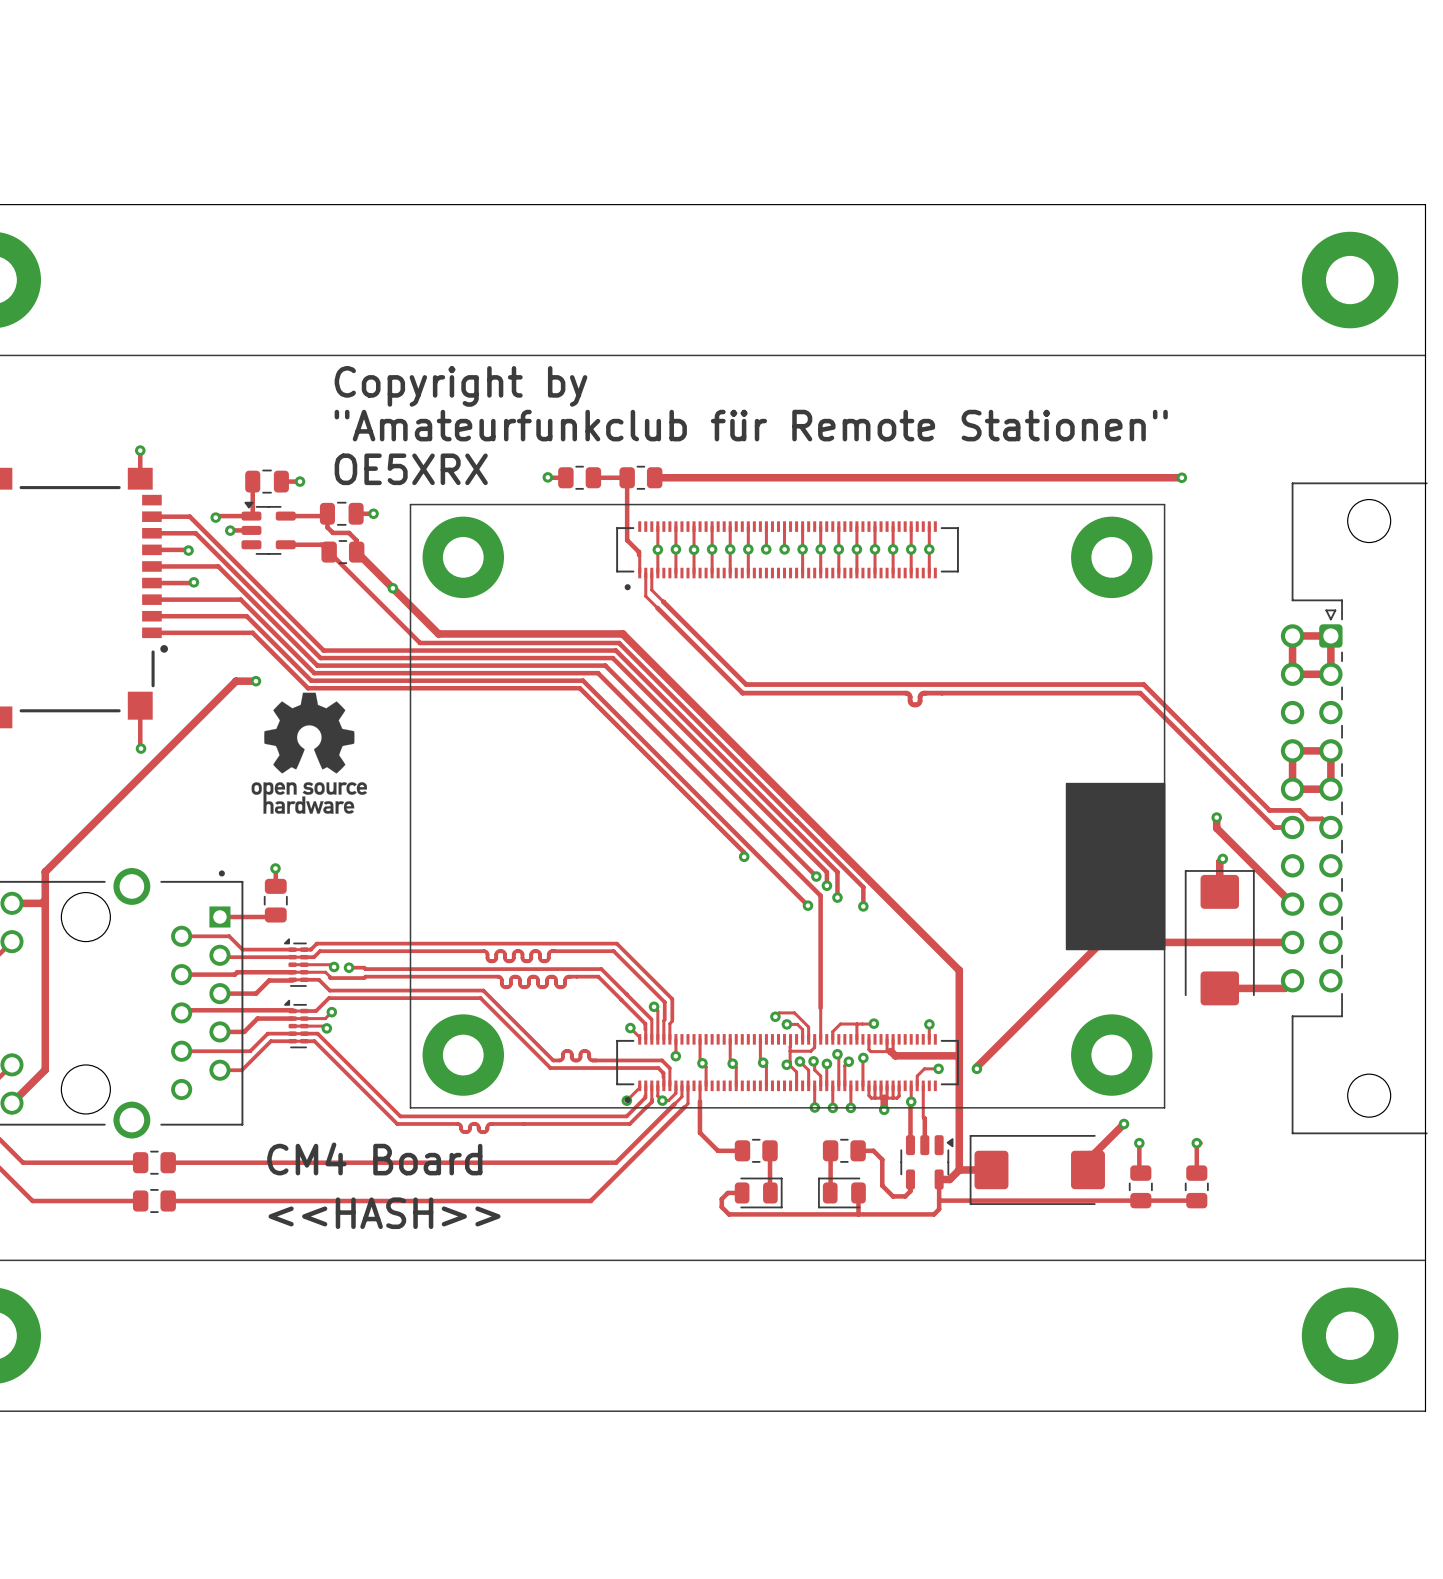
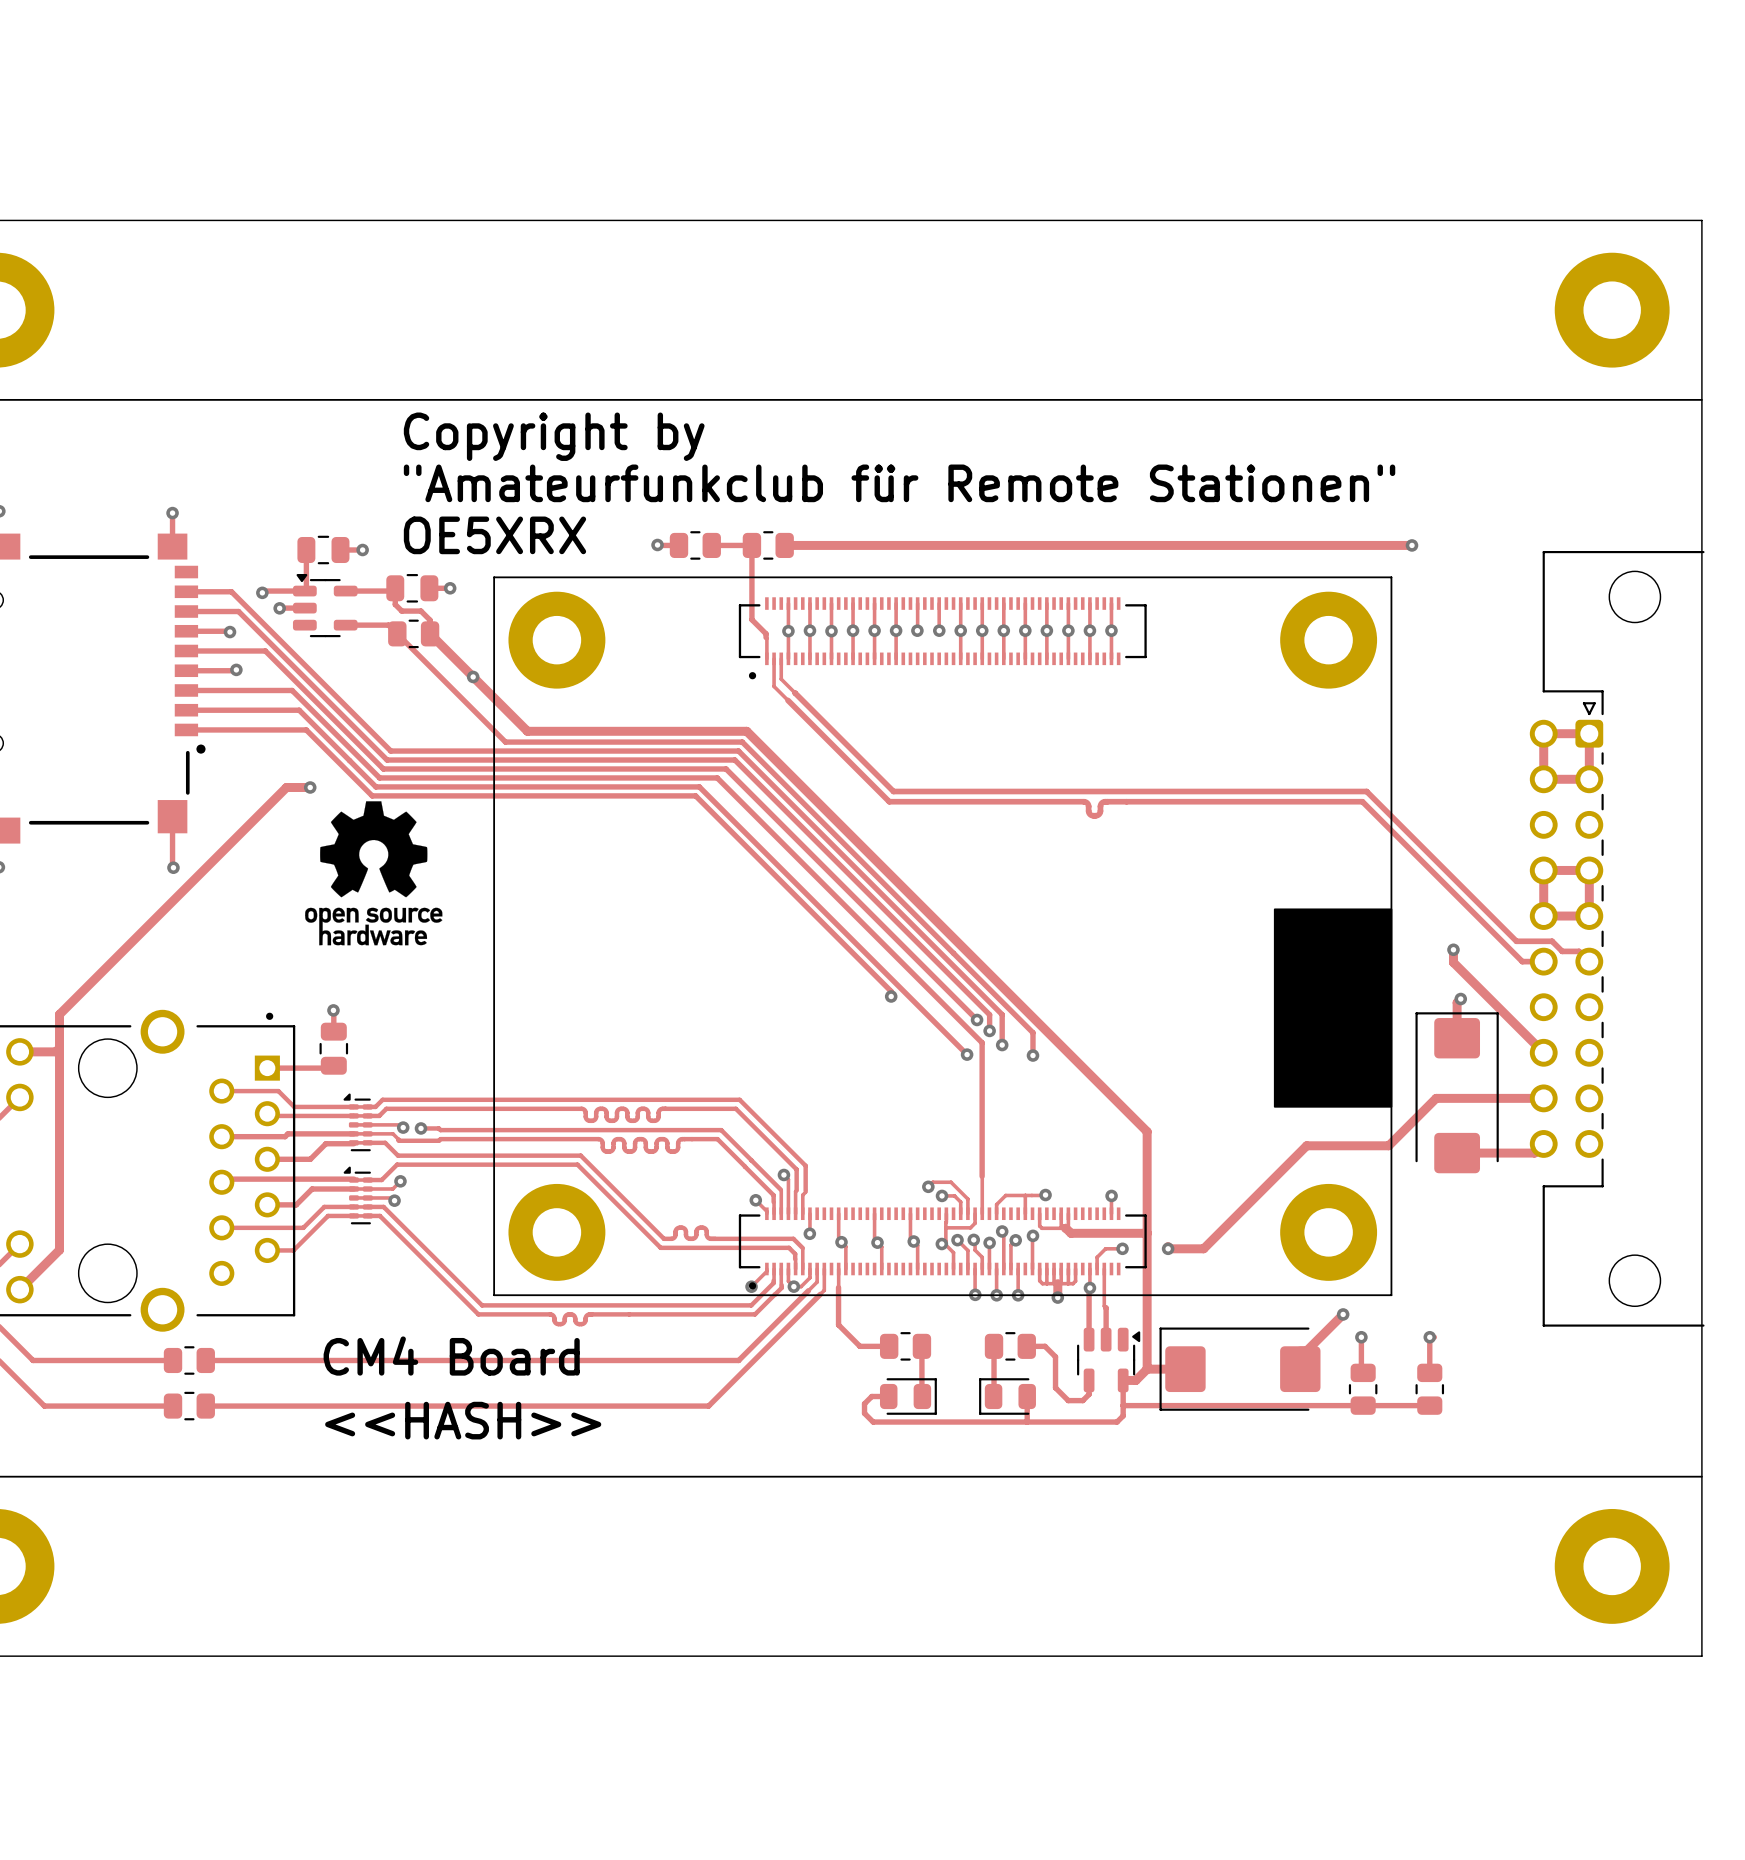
track: (1202, 942) (1101, 942) (976, 1066) -> (1436, 1098) (1388, 1145) (1306, 1145) (1203, 1248) (1168, 1248)

